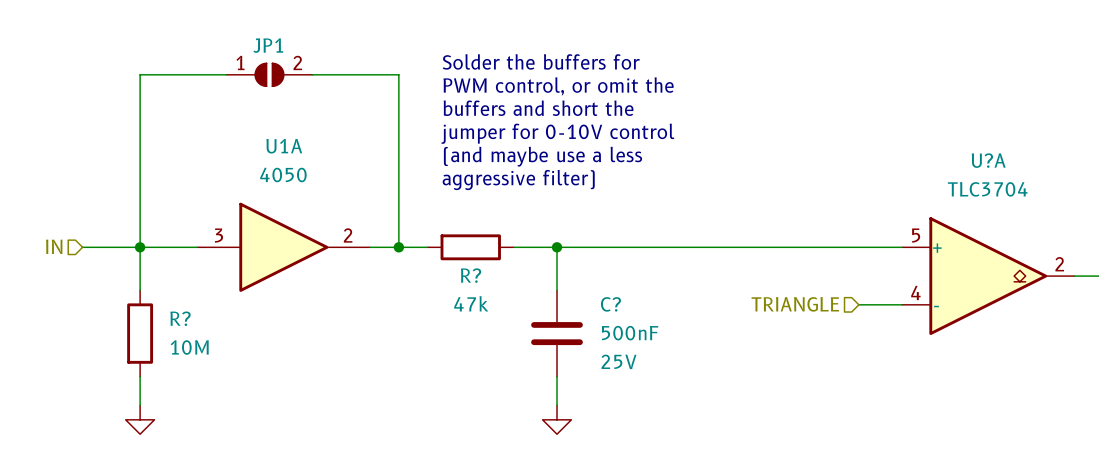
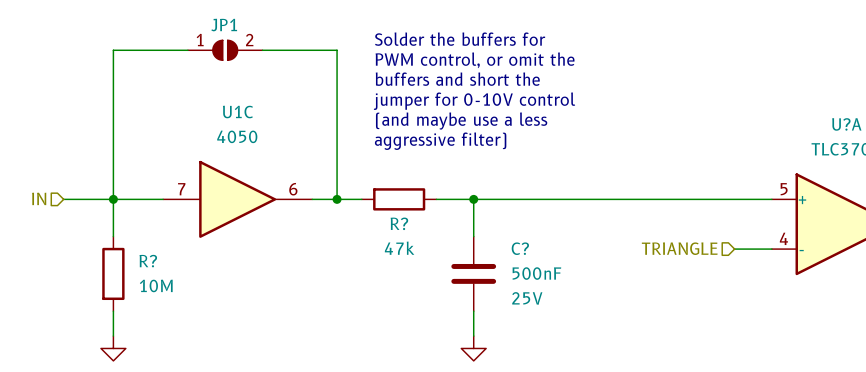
U1A name: U1A (284, 146) -> U1C (237, 112)
U1A pin number: 3 (218, 235) -> 7 (181, 189)
U1A pin number: 2 (348, 235) -> 6 (293, 189)

